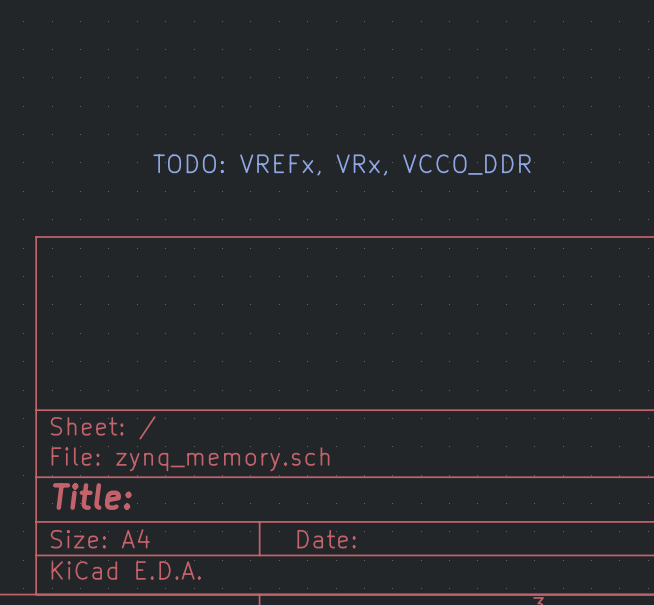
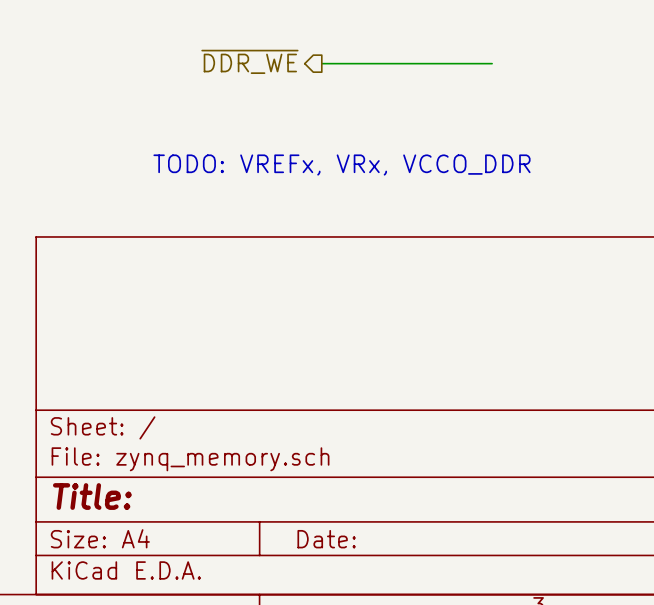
hierarchical label: none -> ~{DDR_WE} (249, 61)
wire: none -> (321, 63) (492, 63)

